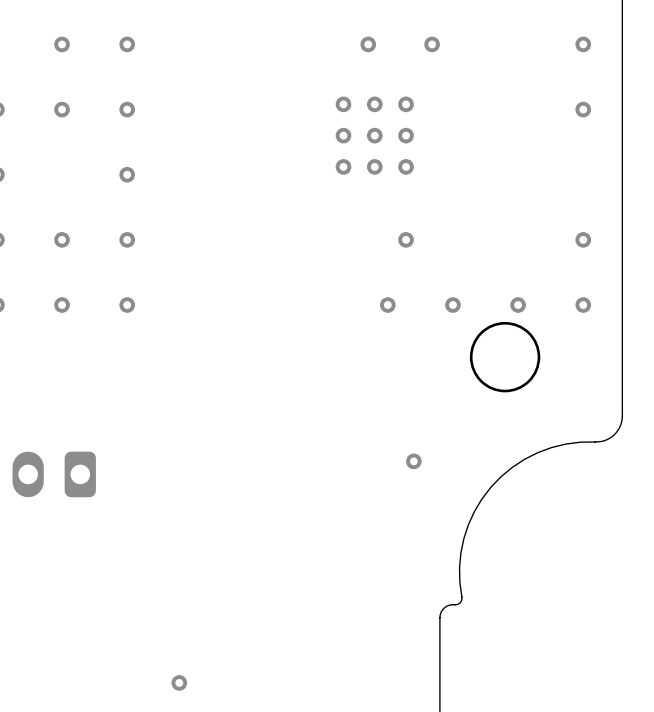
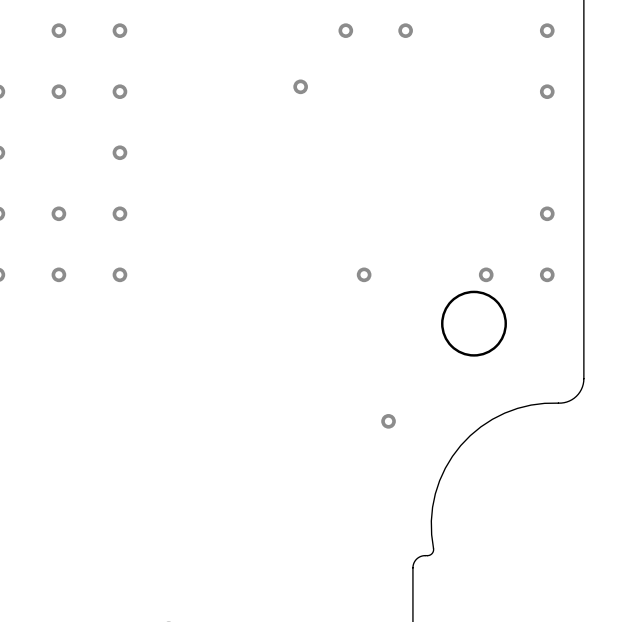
via: none -> (300, 86)
via: (343, 104) -> none
via: (374, 104) -> none
via: (406, 104) -> none
via: (343, 135) -> none
via: (374, 135) -> none
via: (406, 135) -> none
via: (343, 166) -> none
via: (374, 166) -> none
via: (406, 166) -> none
via: (406, 239) -> none
via: (452, 305) -> none
part: (54, 474) -> none

